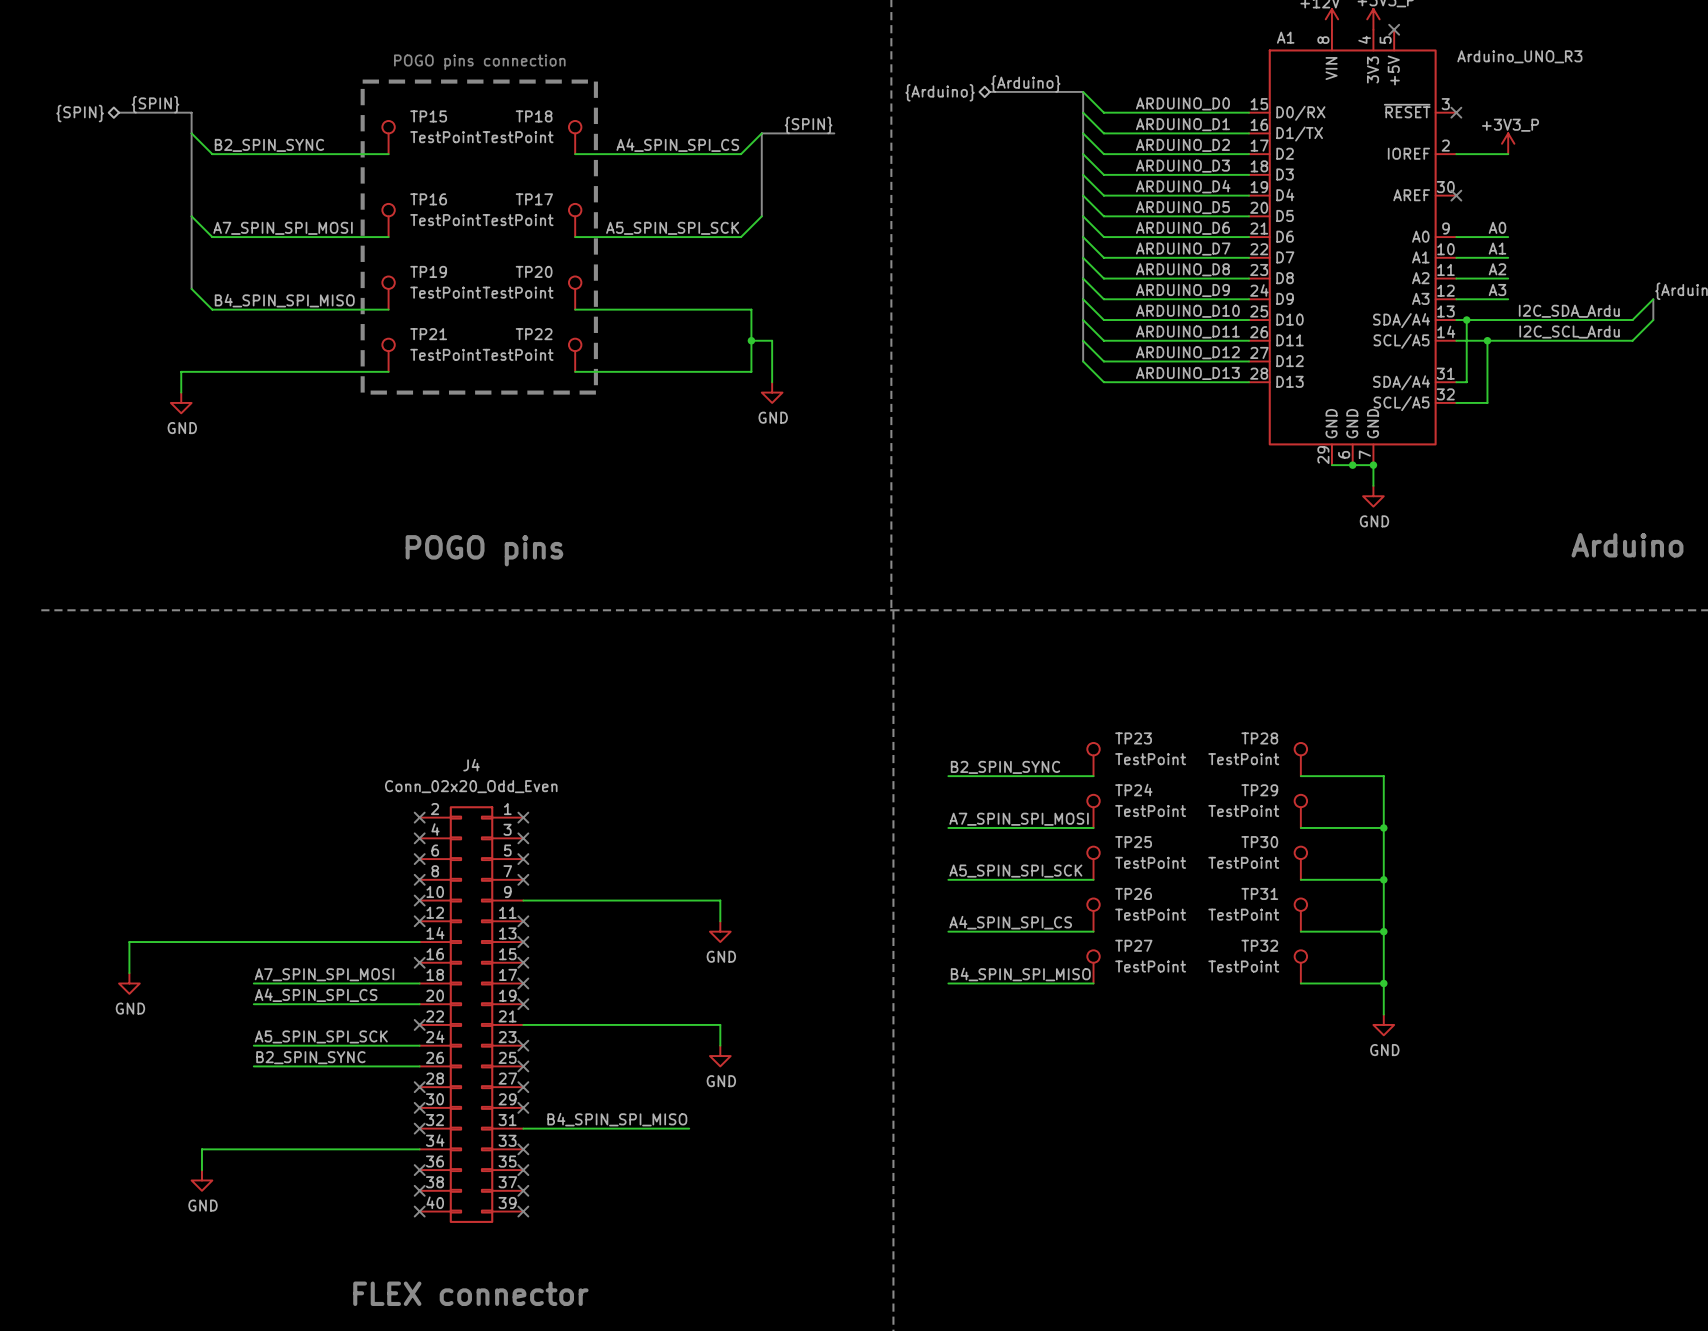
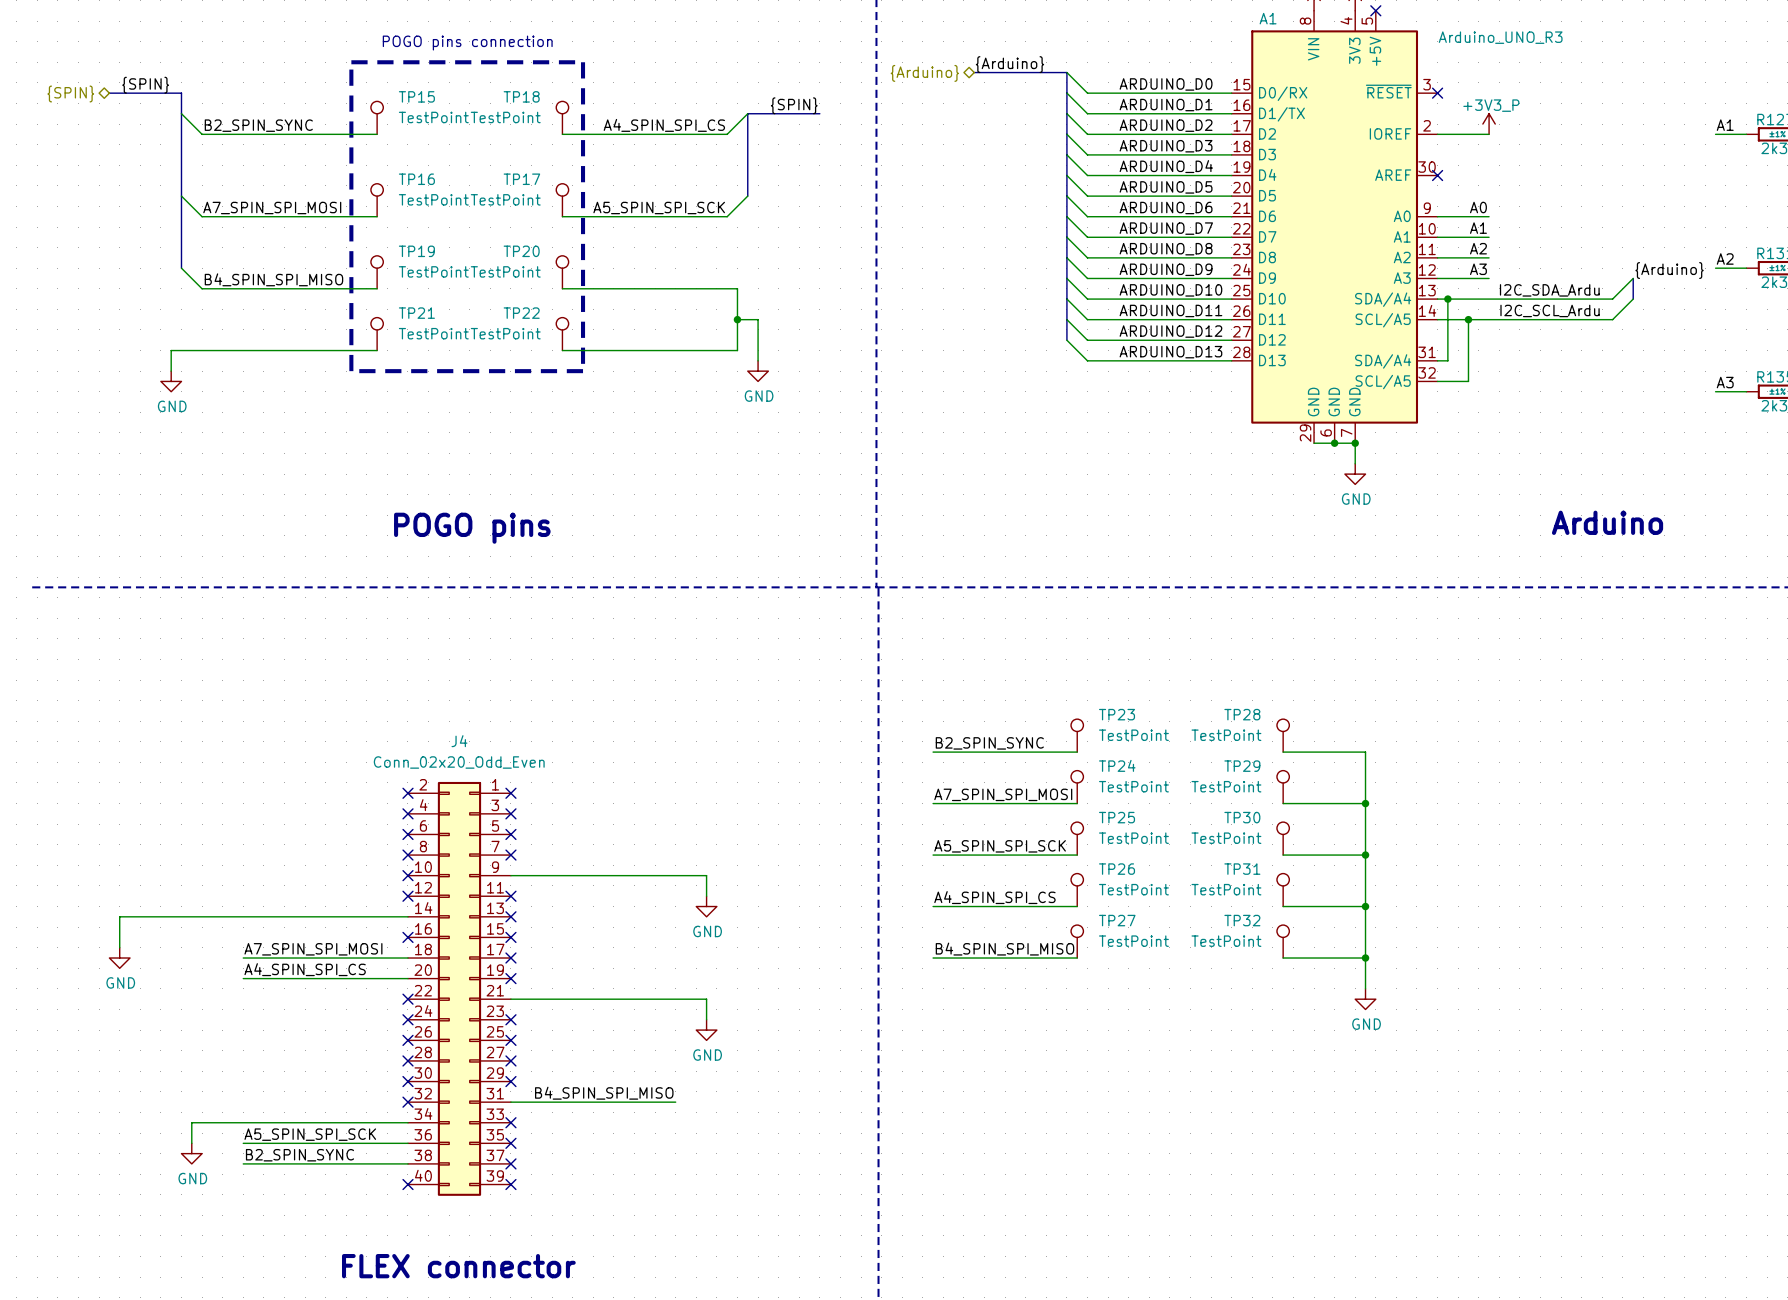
label position: A5_SPIN_SPI_SCK (321, 1036) -> A5_SPIN_SPI_SCK (310, 1134)
wire: (253, 1045) (419, 1045) -> (243, 1163) (407, 1163)
no-connect mark: none -> (407, 1019)
label position: B2_SPIN_SYNC (310, 1057) -> B2_SPIN_SYNC (299, 1155)
wire: (253, 1066) (419, 1066) -> (243, 1143) (407, 1143)
no-connect mark: none -> (407, 1040)
no-connect mark: (419, 1170) -> none
no-connect mark: (419, 1190) -> none

